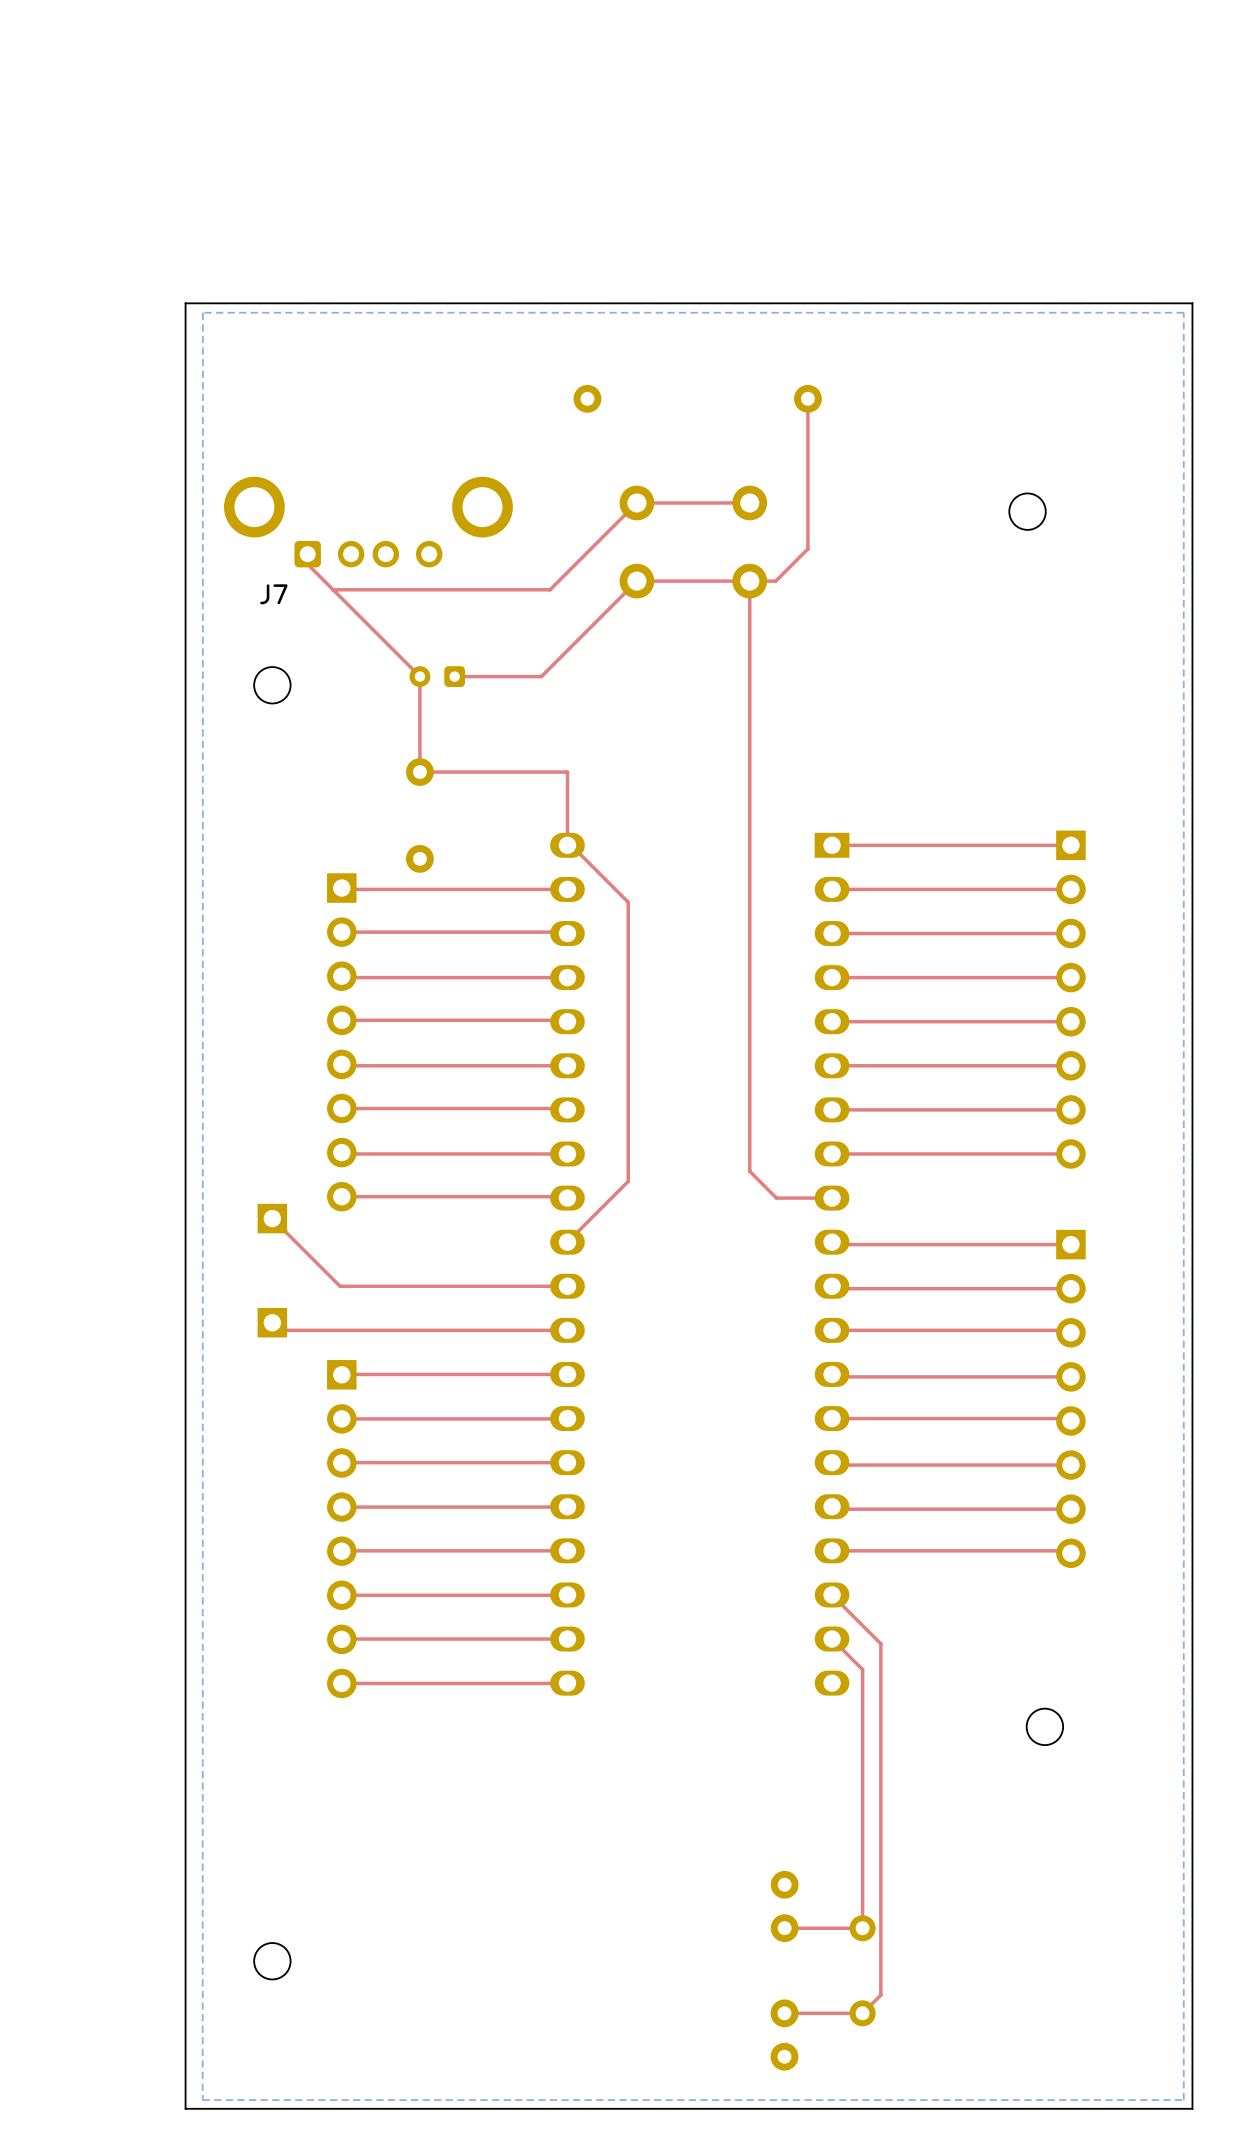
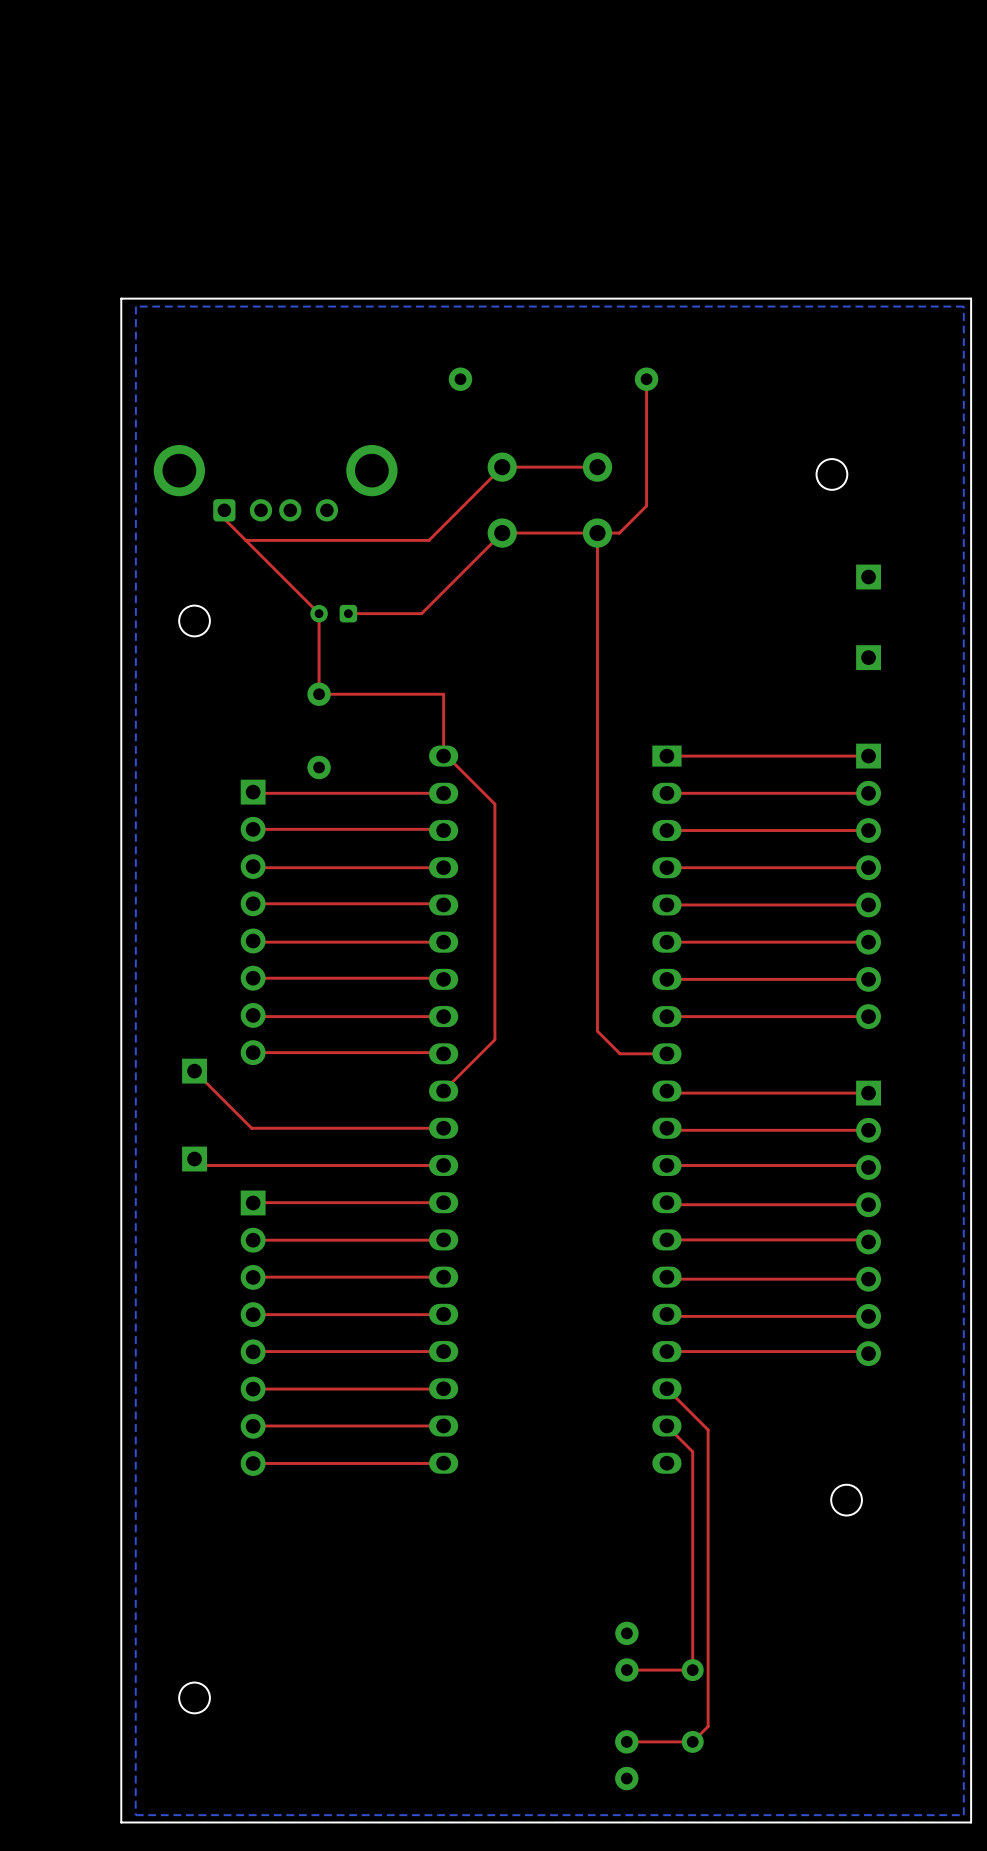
J7 name: J7 (273, 594) -> none
part: none -> (868, 577)
part: none -> (868, 657)

